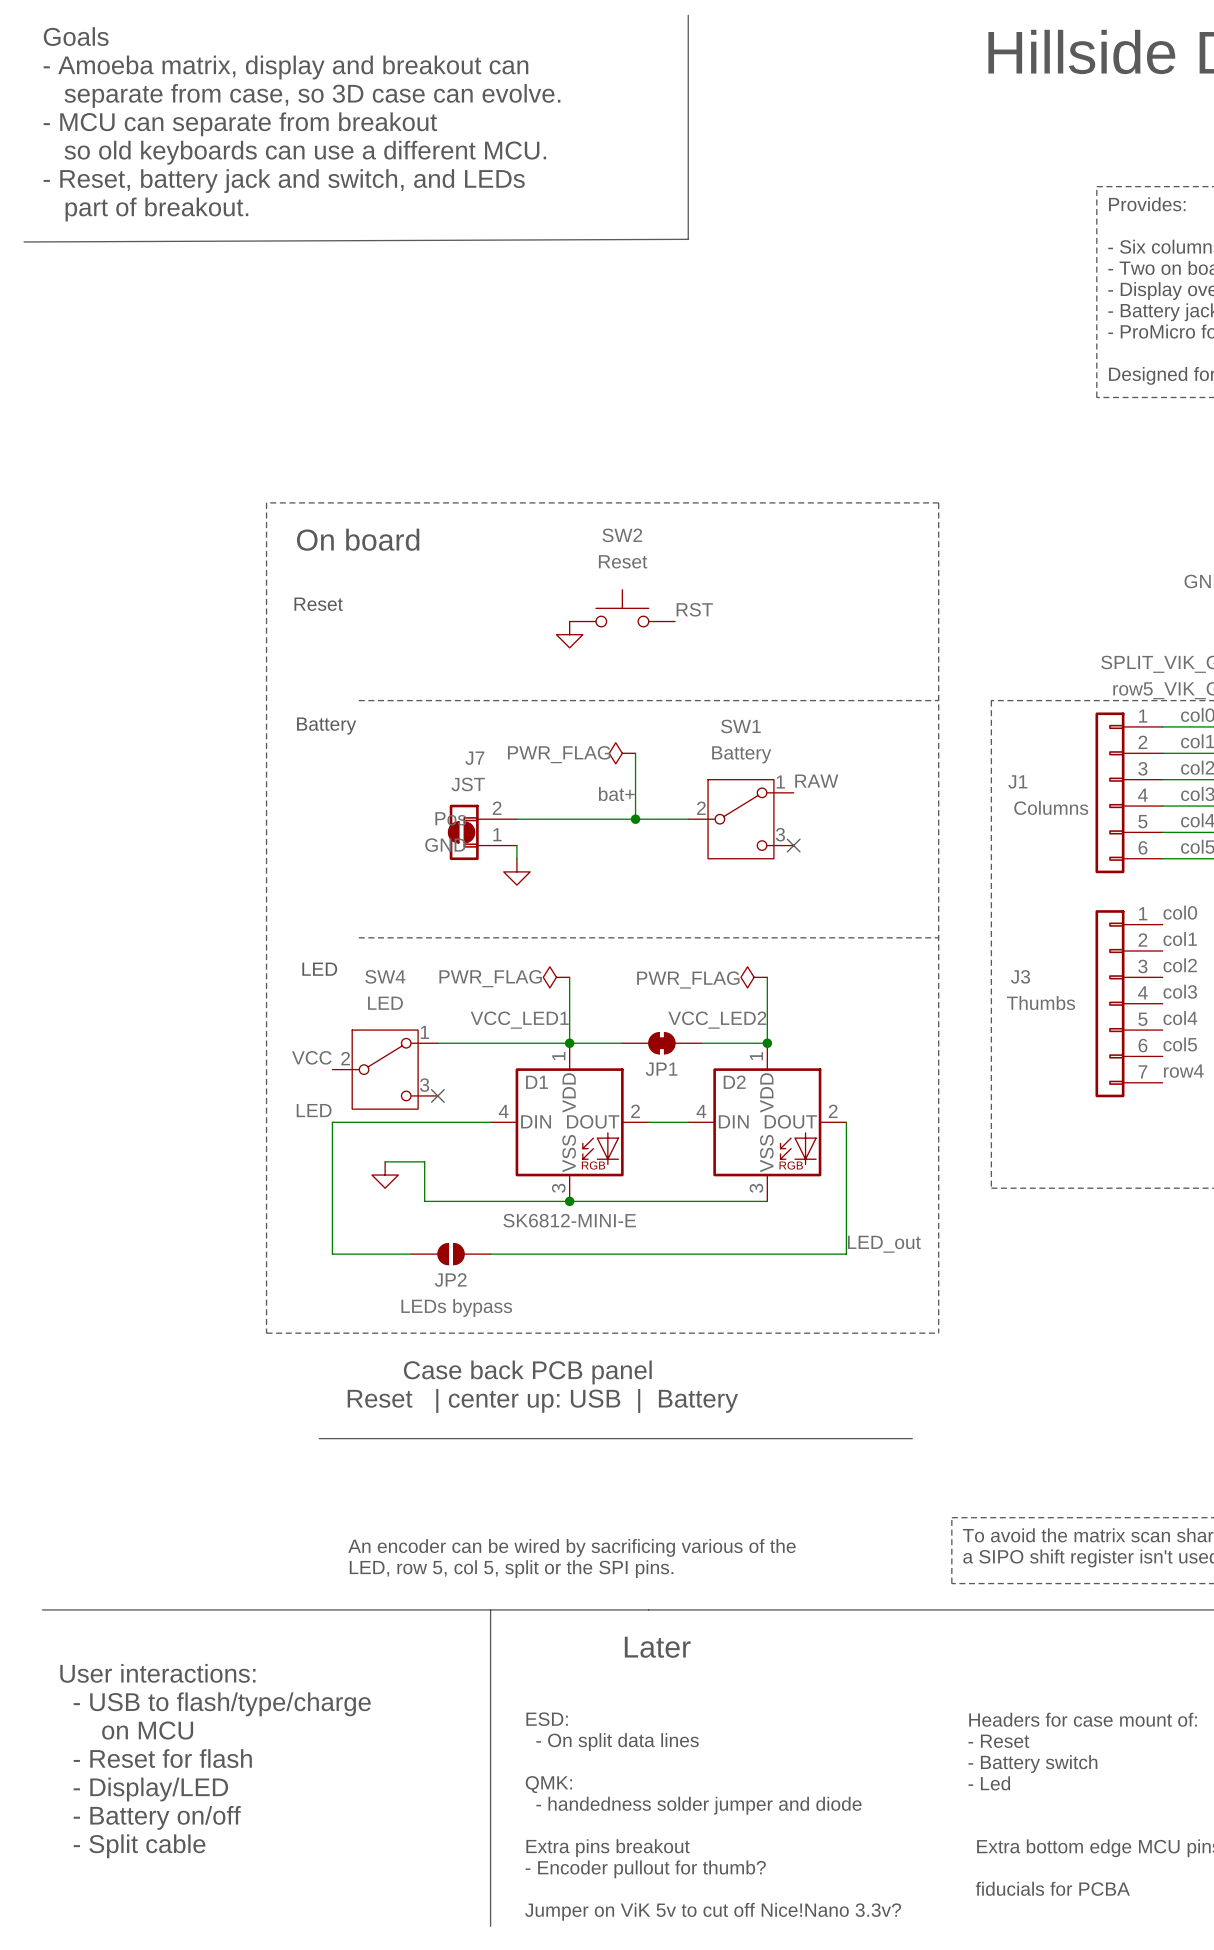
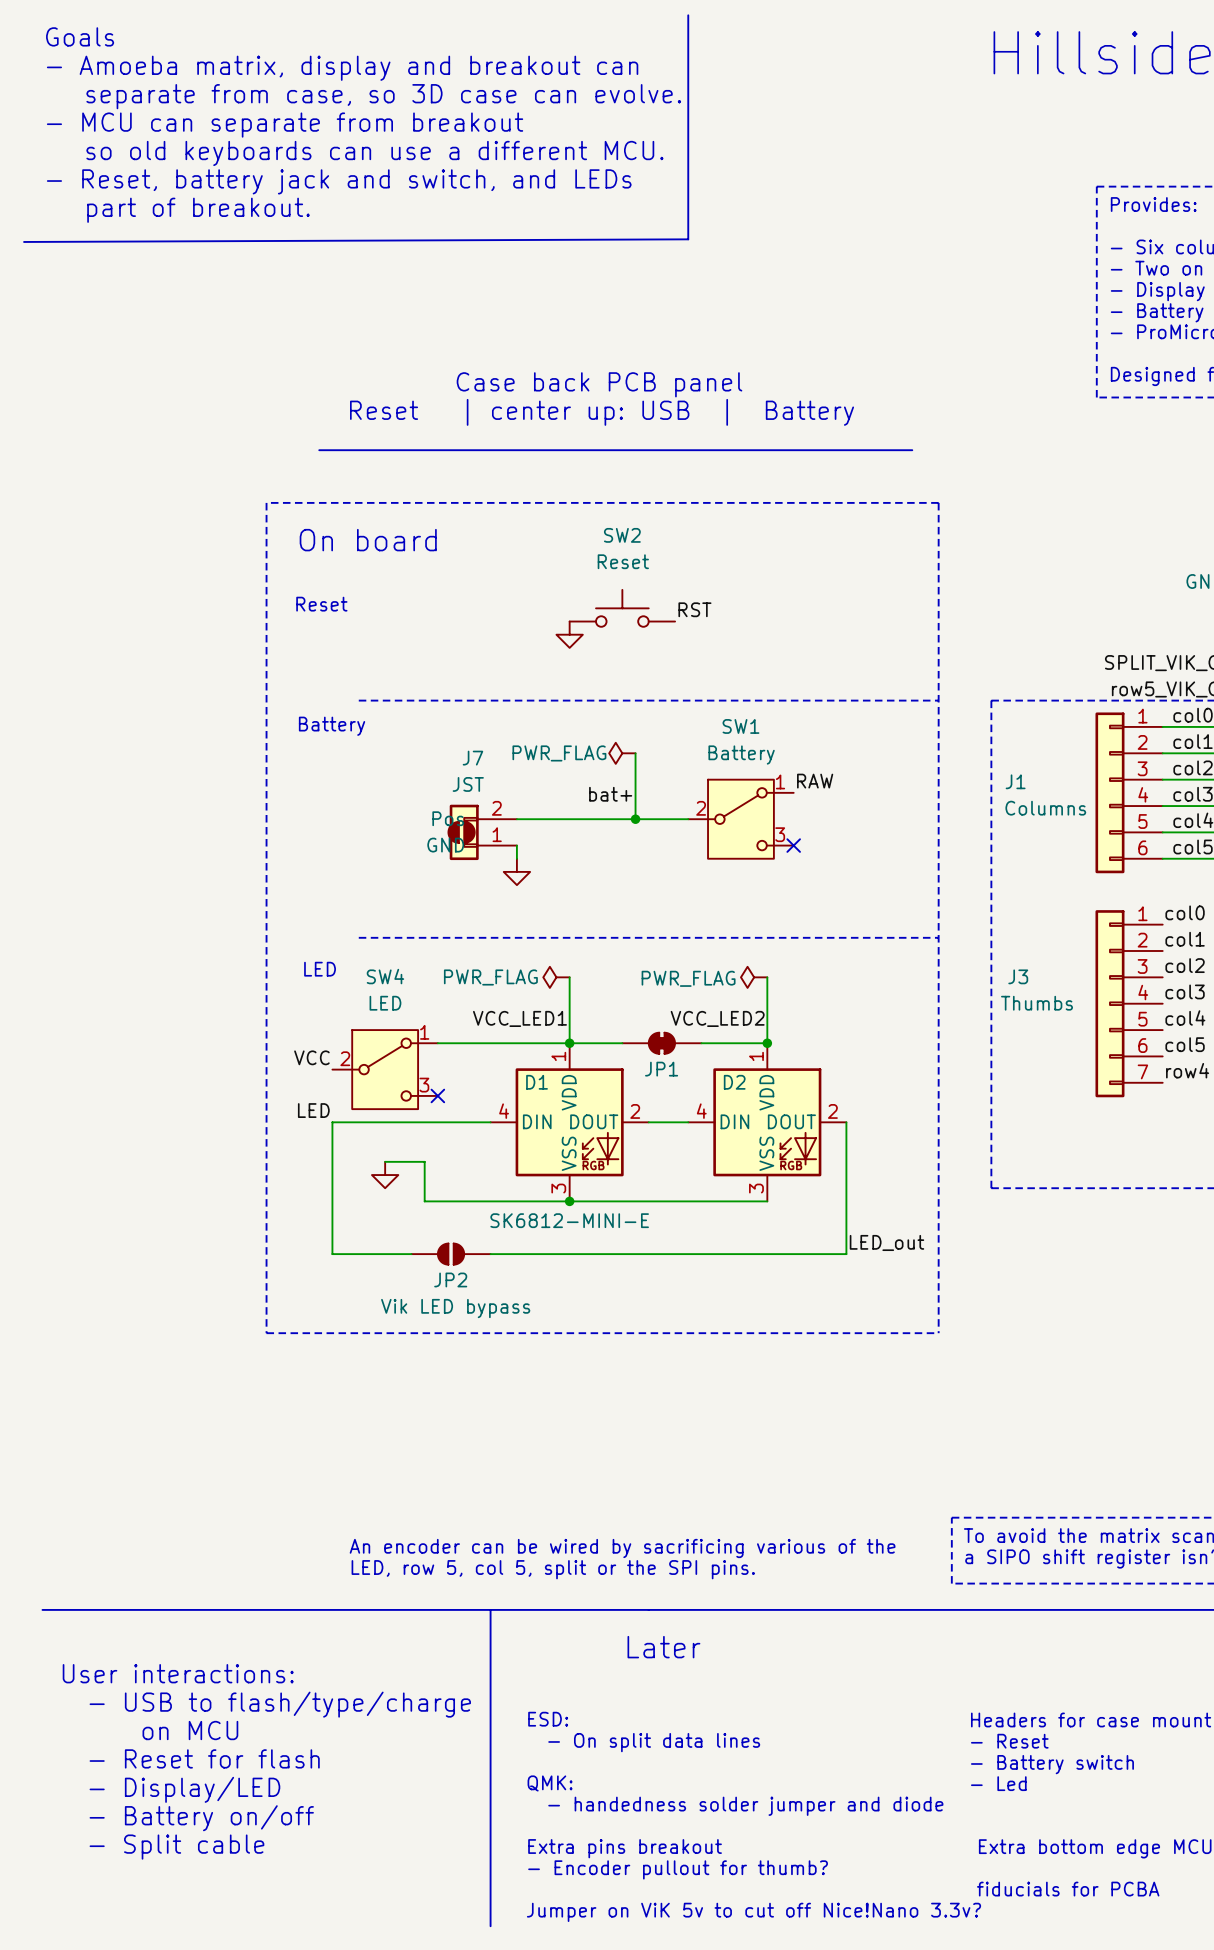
text: none -> Case back PCB panel (599, 384)
text: none -> Reset | center up: USB | Battery (602, 412)
line: none -> (319, 450) (912, 450)
JP2 value: LEDs bypass (456, 1307) -> Vik LED bypass (455, 1308)
text: Case back PCB panel (527, 1372) -> none
text: Reset | center up: USB | Battery (542, 1400) -> none
line: (319, 1438) (912, 1438) -> none

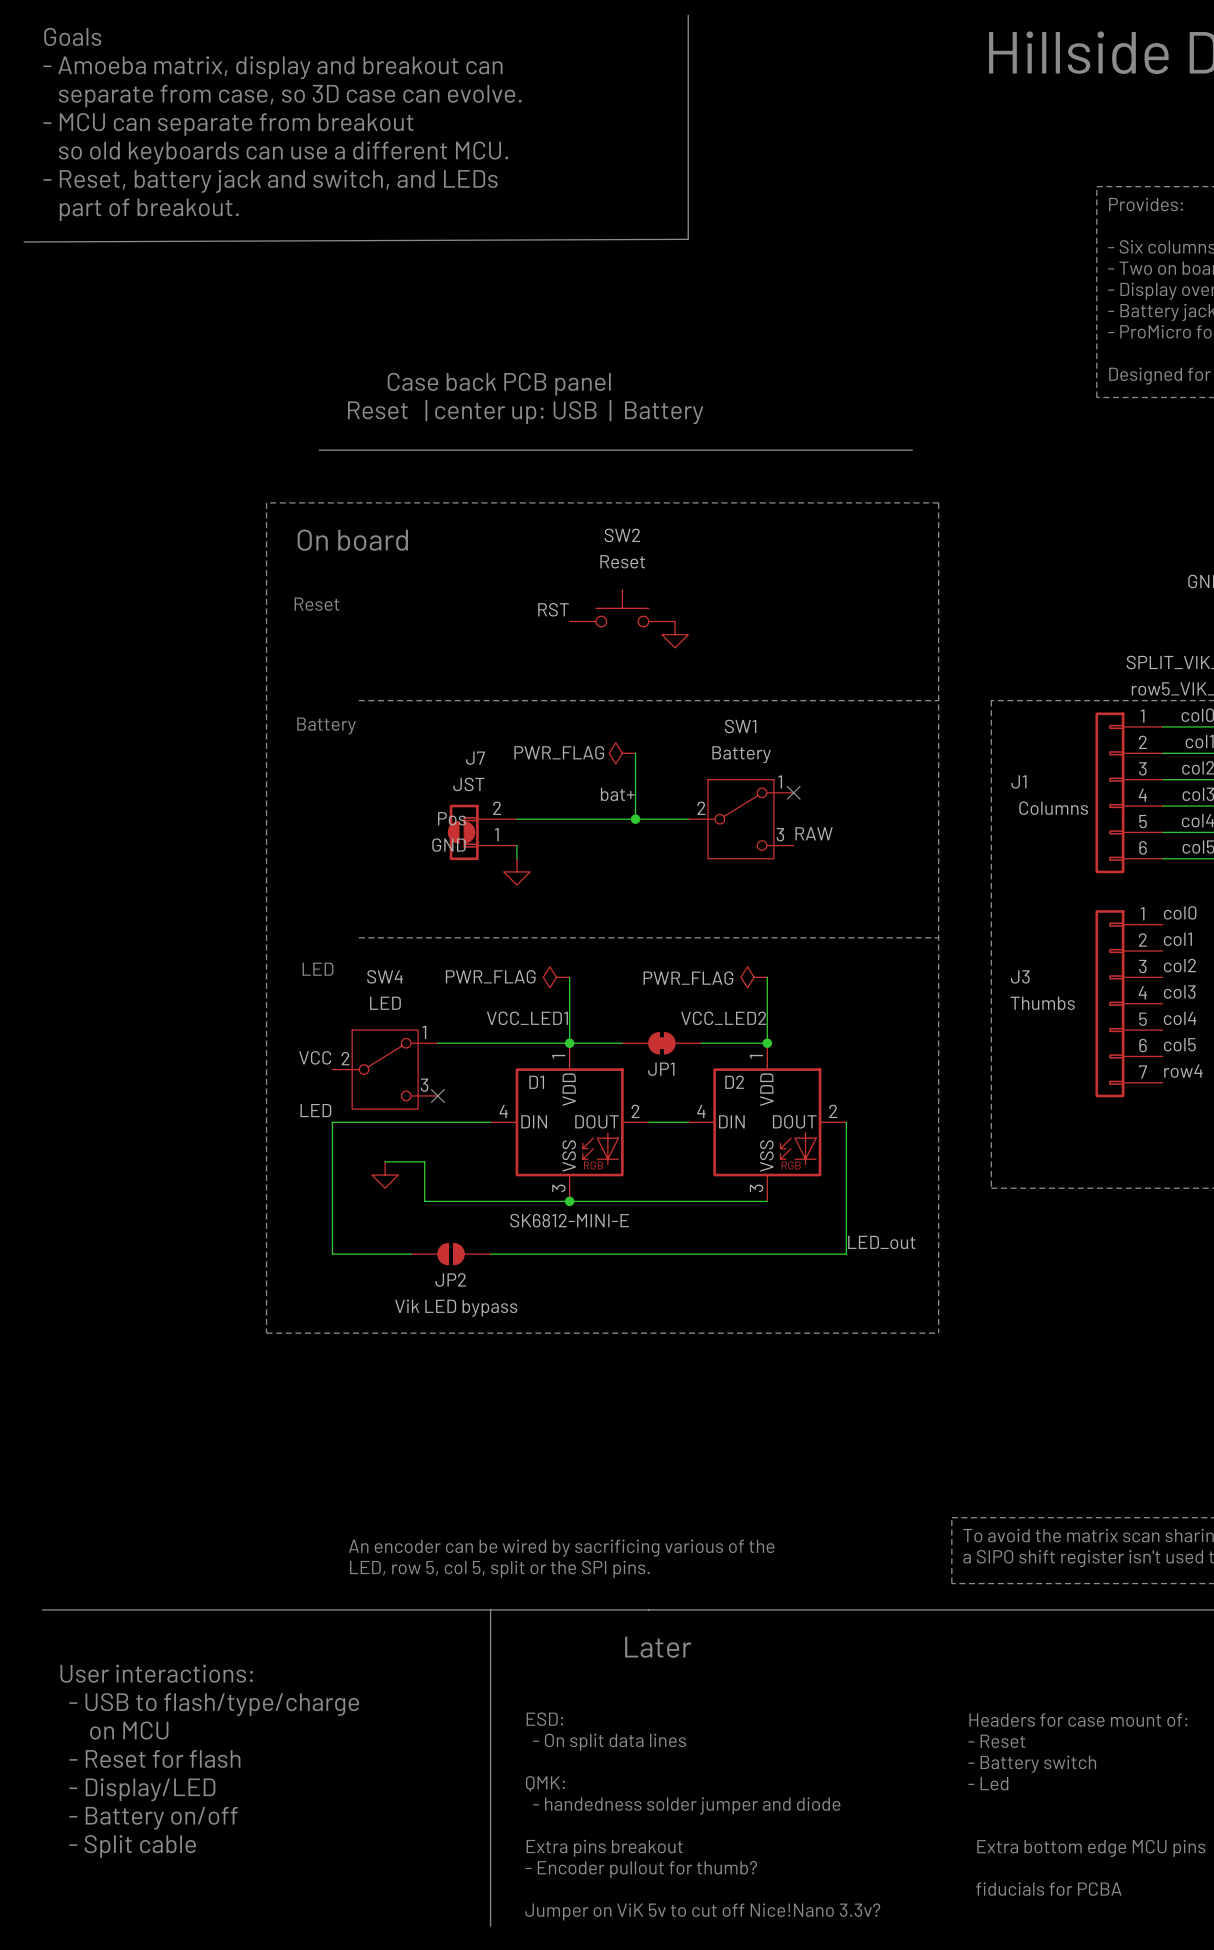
label position: RST (694, 609) -> RST (553, 609)
power symbol position: (569, 634) -> (675, 634)
label position: RAW (815, 781) -> RAW (814, 833)
no-connect mark position: (793, 845) -> (793, 792)

